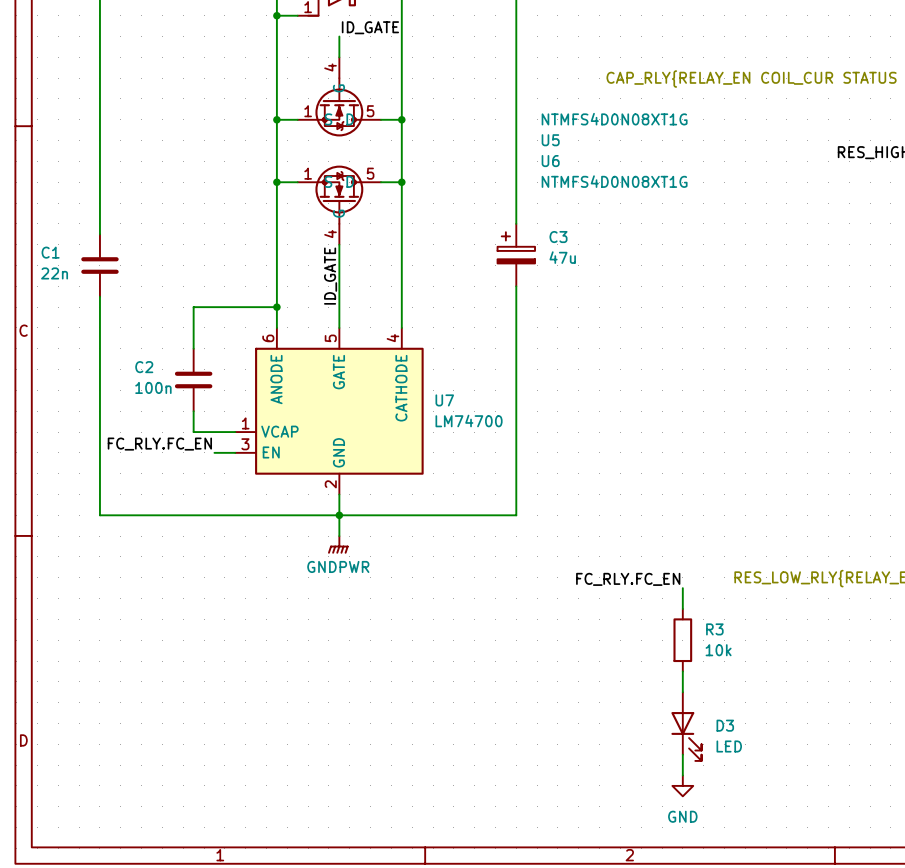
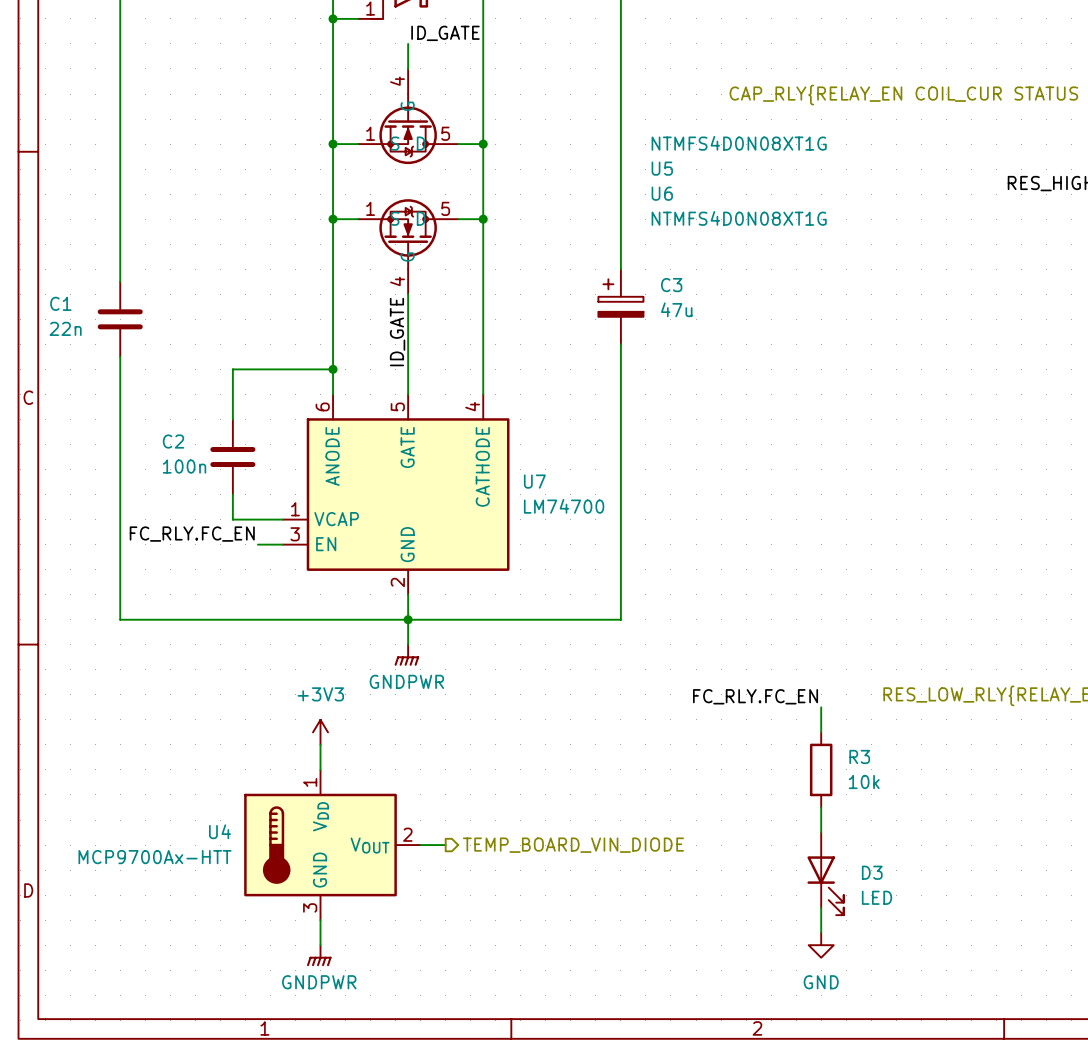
power symbol: none -> +3V3 (320, 732)
wire: none -> (320, 744) (320, 769)
U4: none -> MCP9700Ax-HTT (332, 845)
wire: none -> (420, 845) (445, 845)
hierarchical label: none -> TEMP_BOARD_VIN_DIODE (573, 845)
wire: none -> (320, 920) (320, 945)
power symbol: none -> GNDPWR (319, 955)

